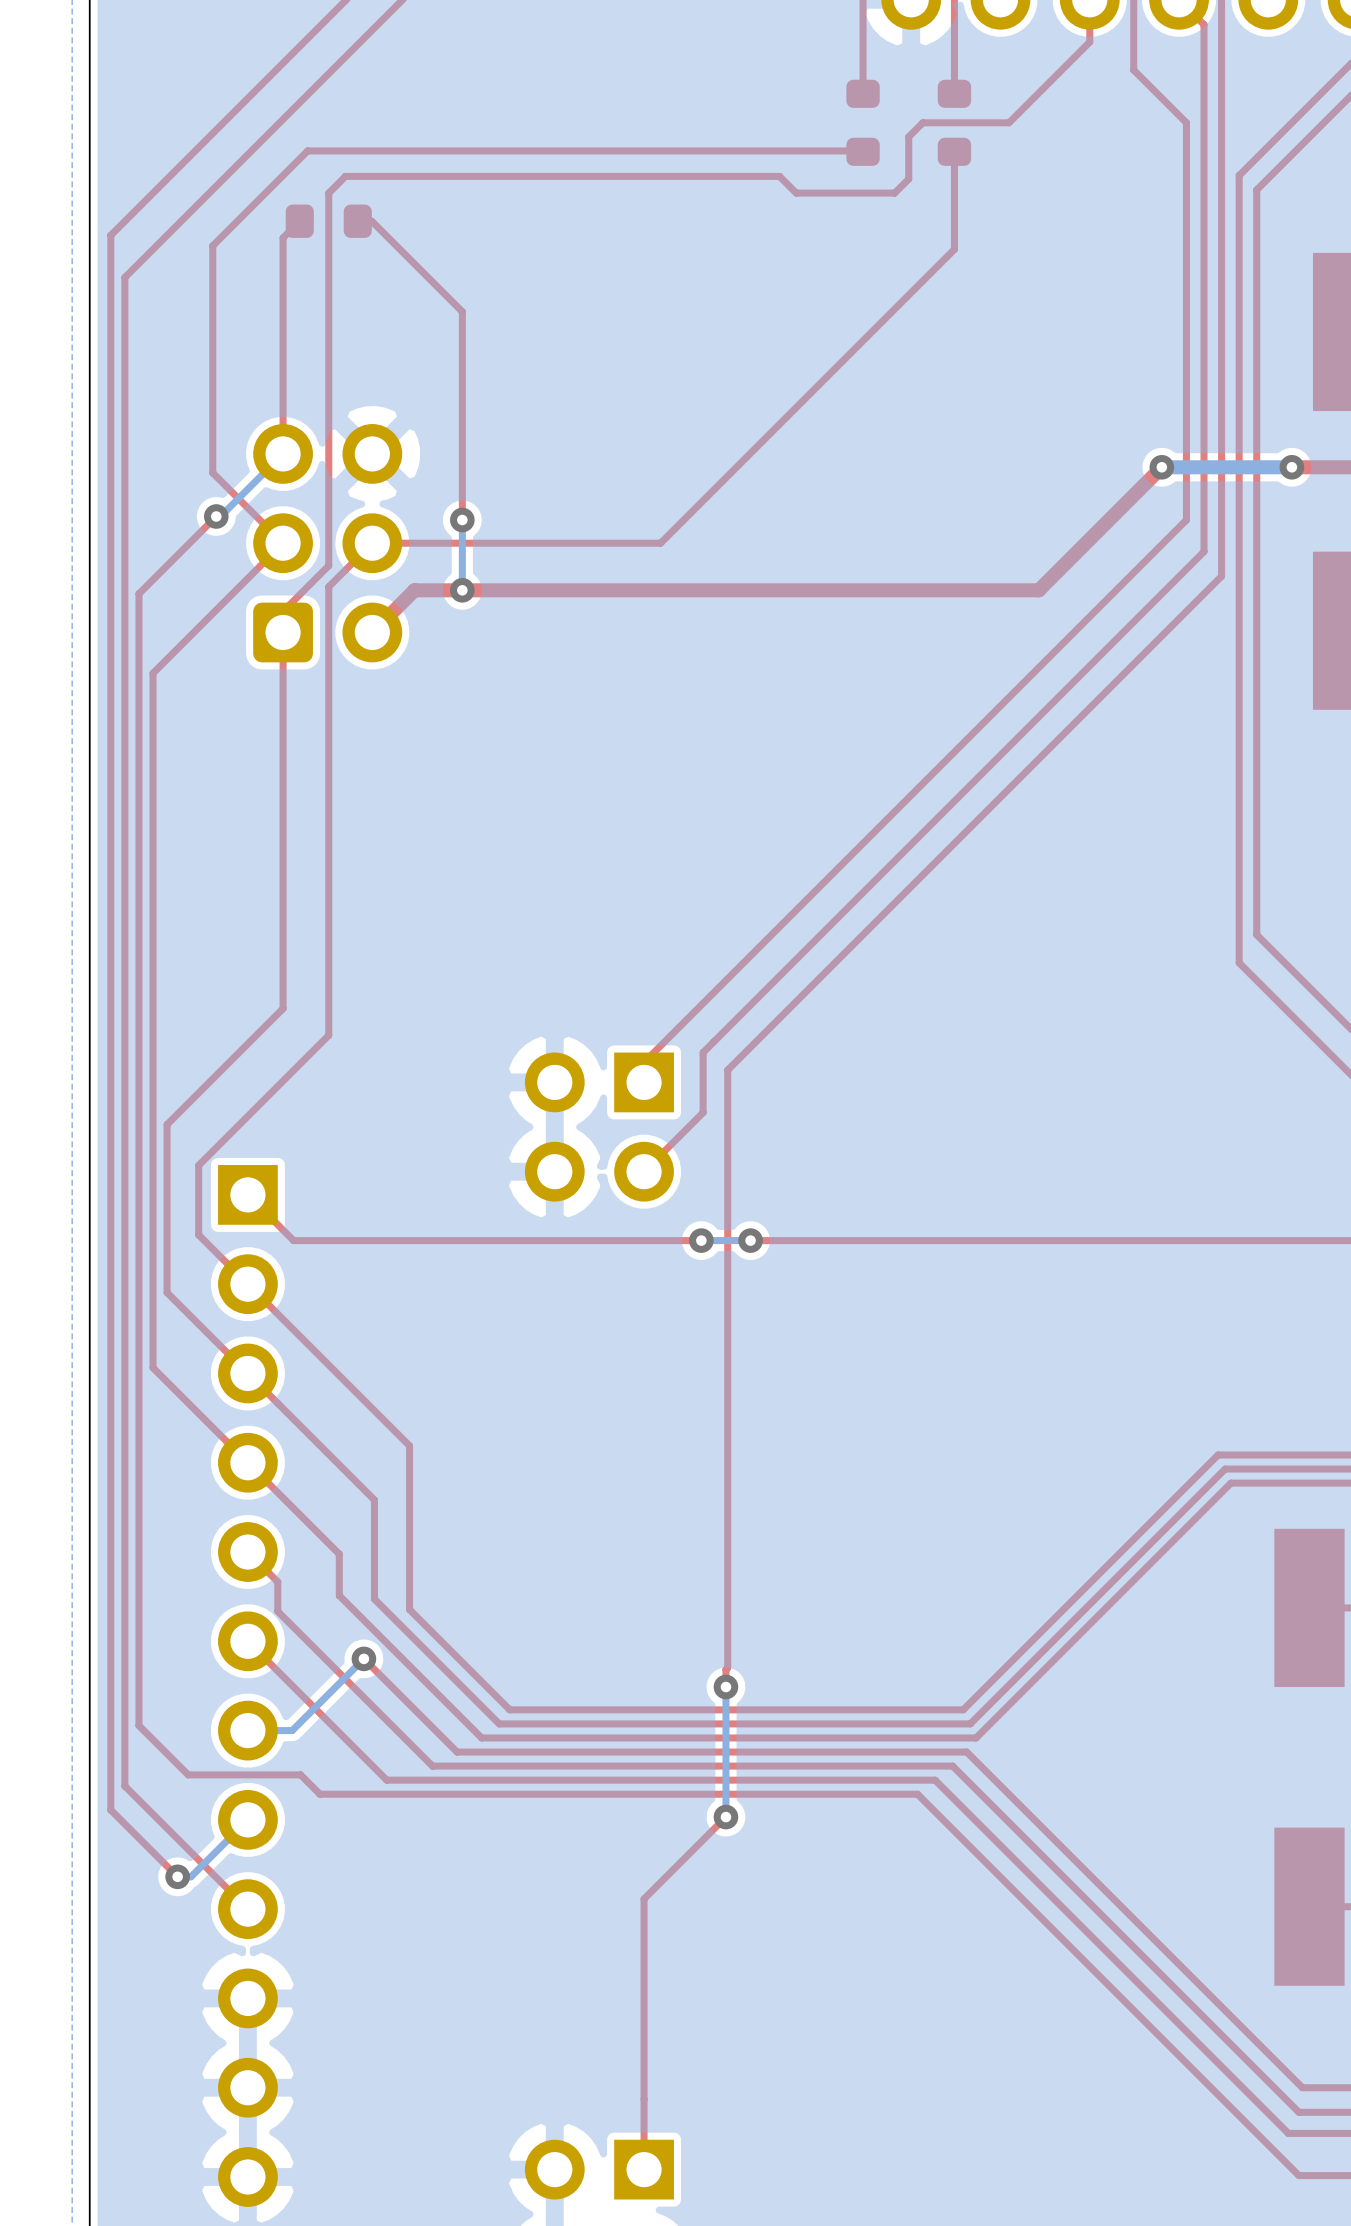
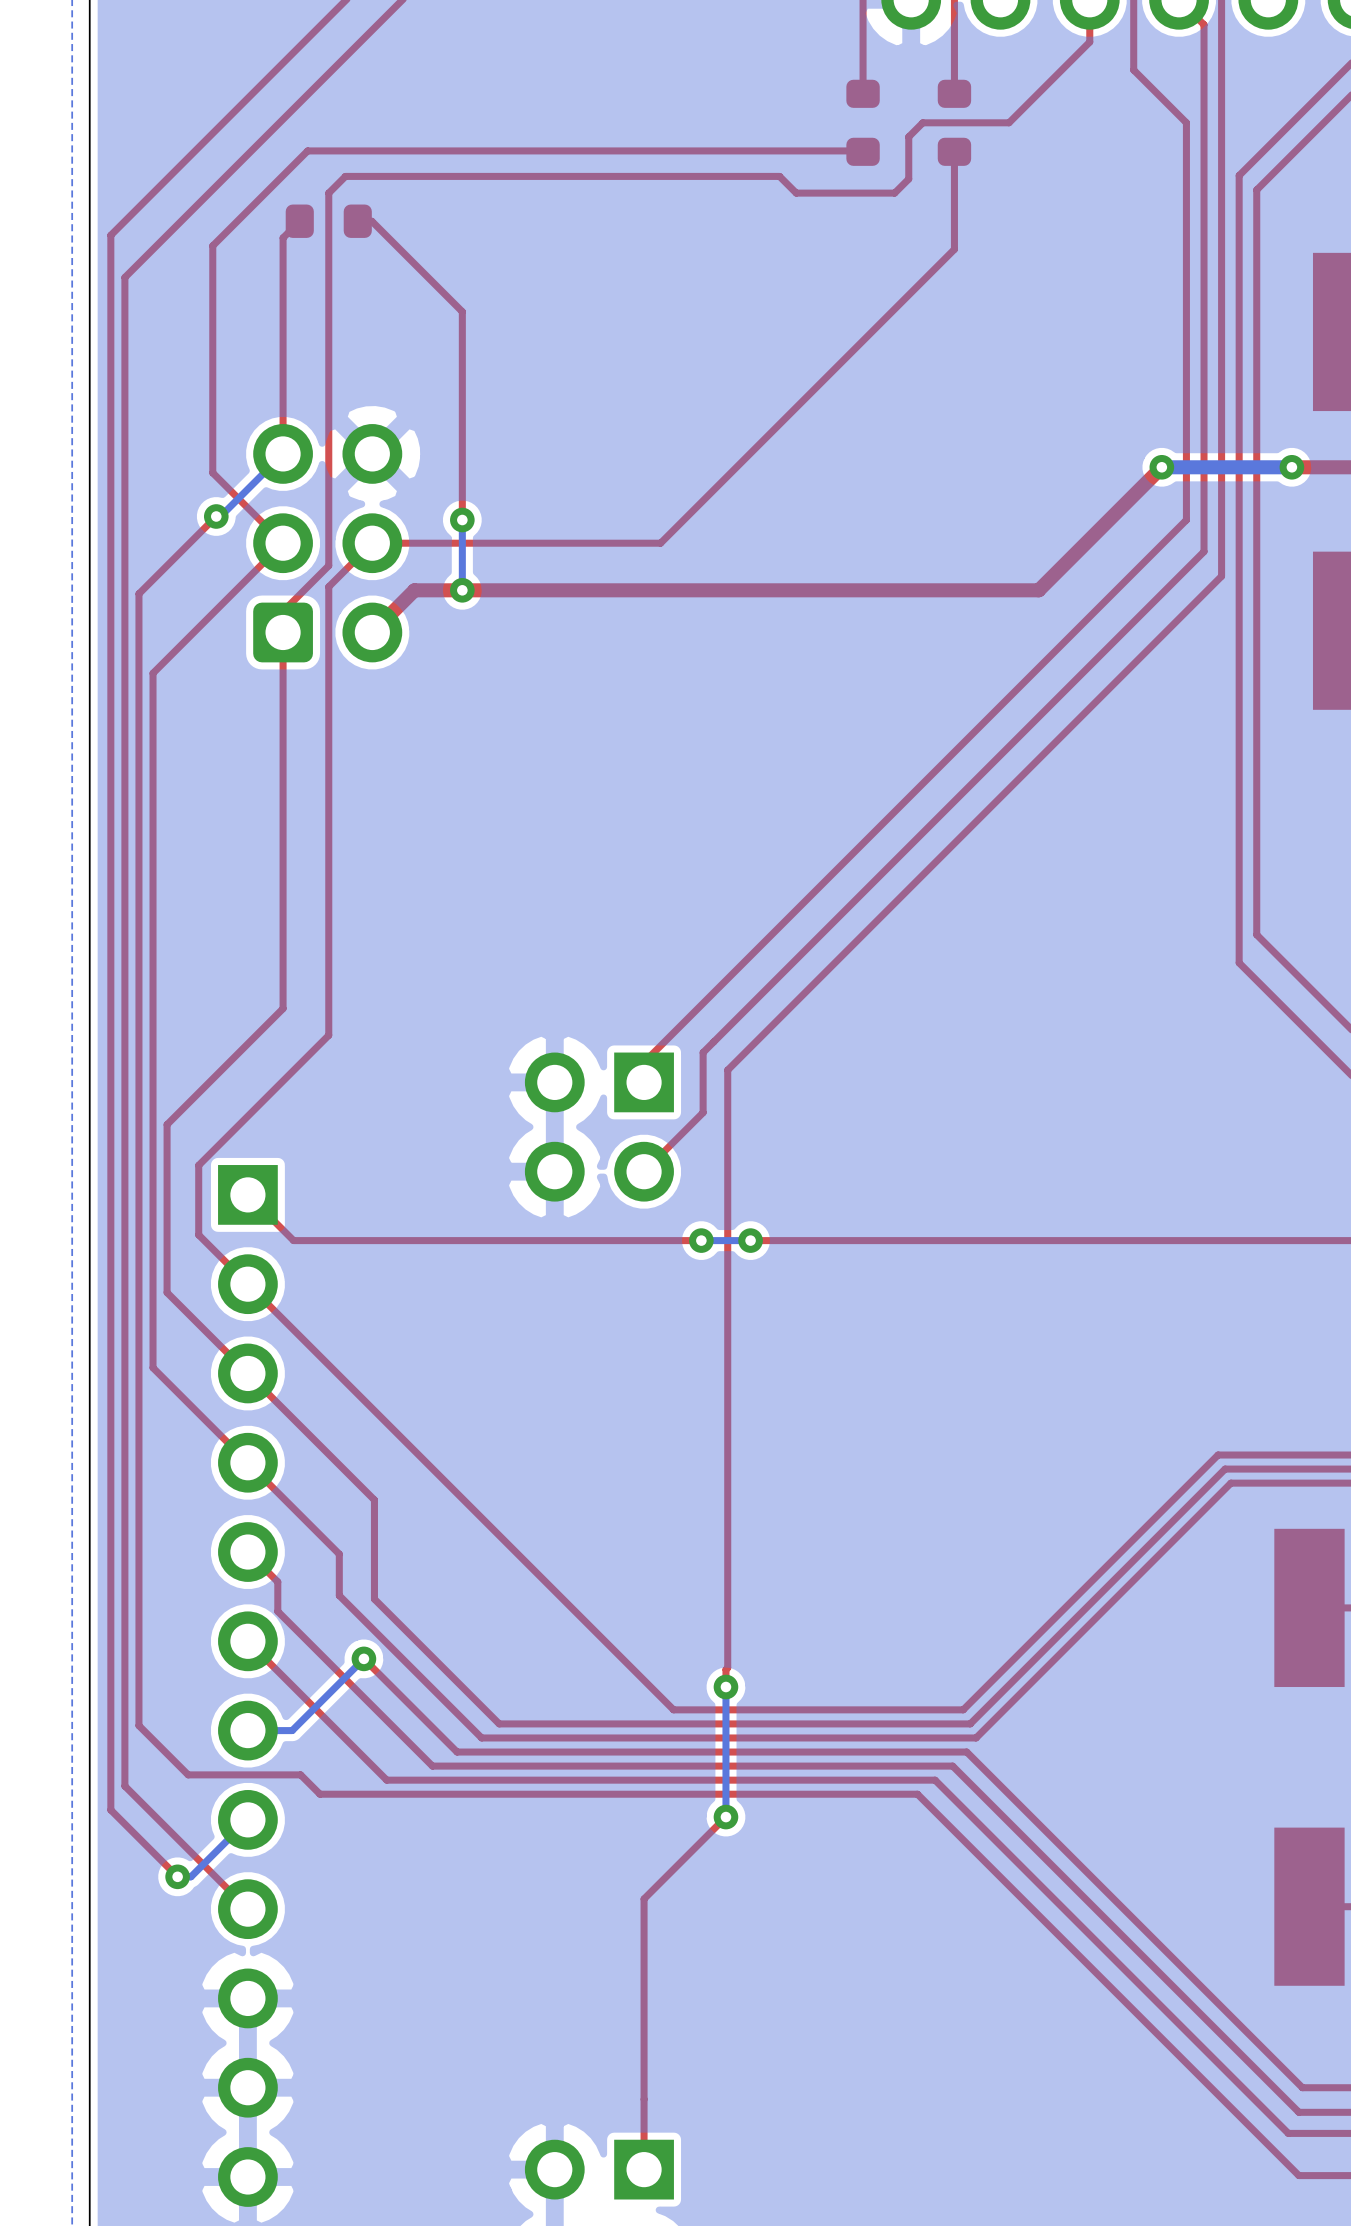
top track: (409, 1445) (409, 1609) (509, 1709) (673, 1709) -> (409, 1445) (673, 1709)

